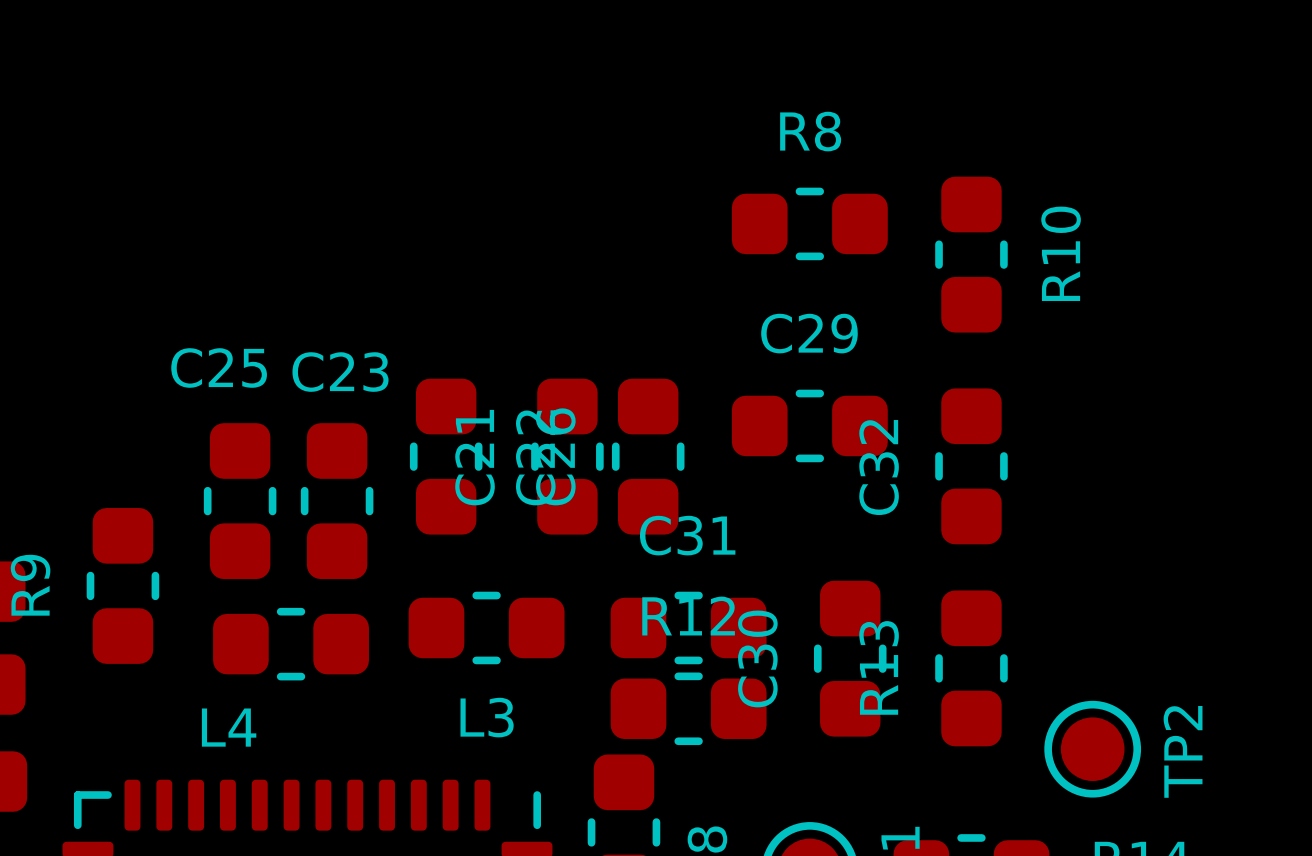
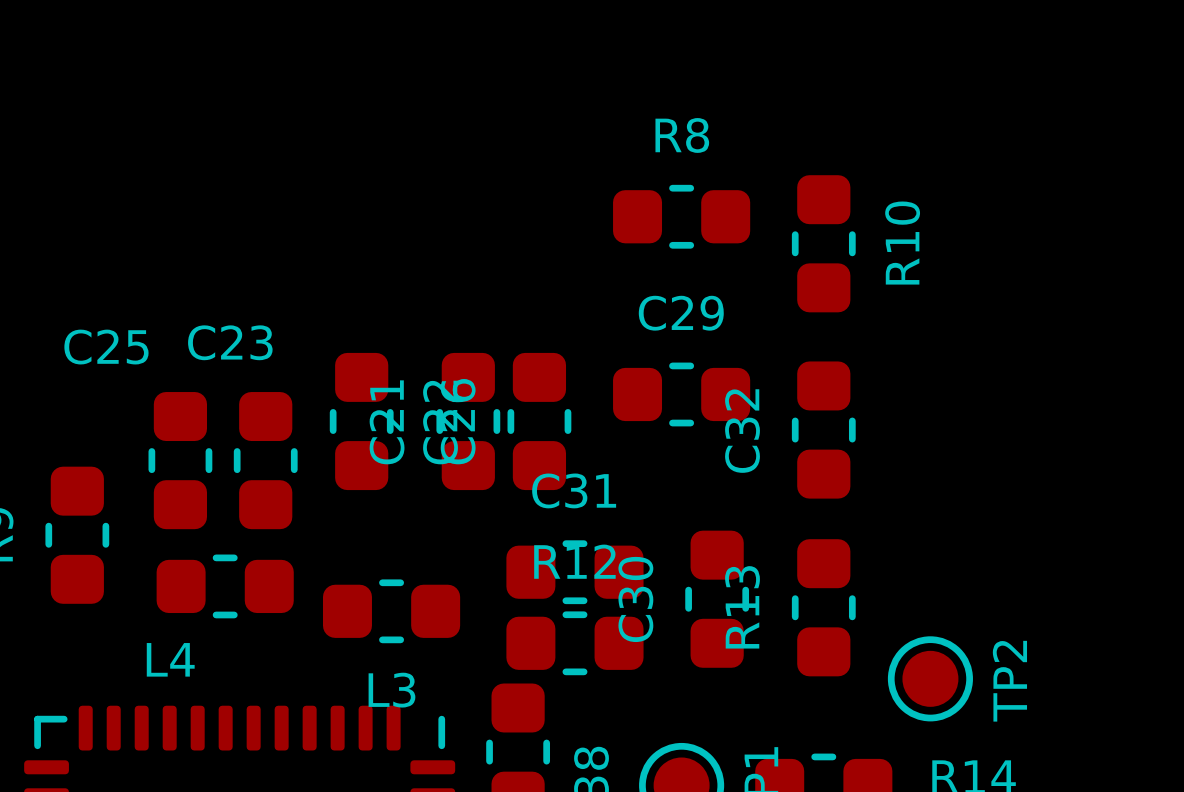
C25 name position: C25 (219, 367) -> C25 (106, 347)
C23 name position: C23 (340, 372) -> C23 (230, 342)
L3 position: (486, 627) -> (391, 611)

